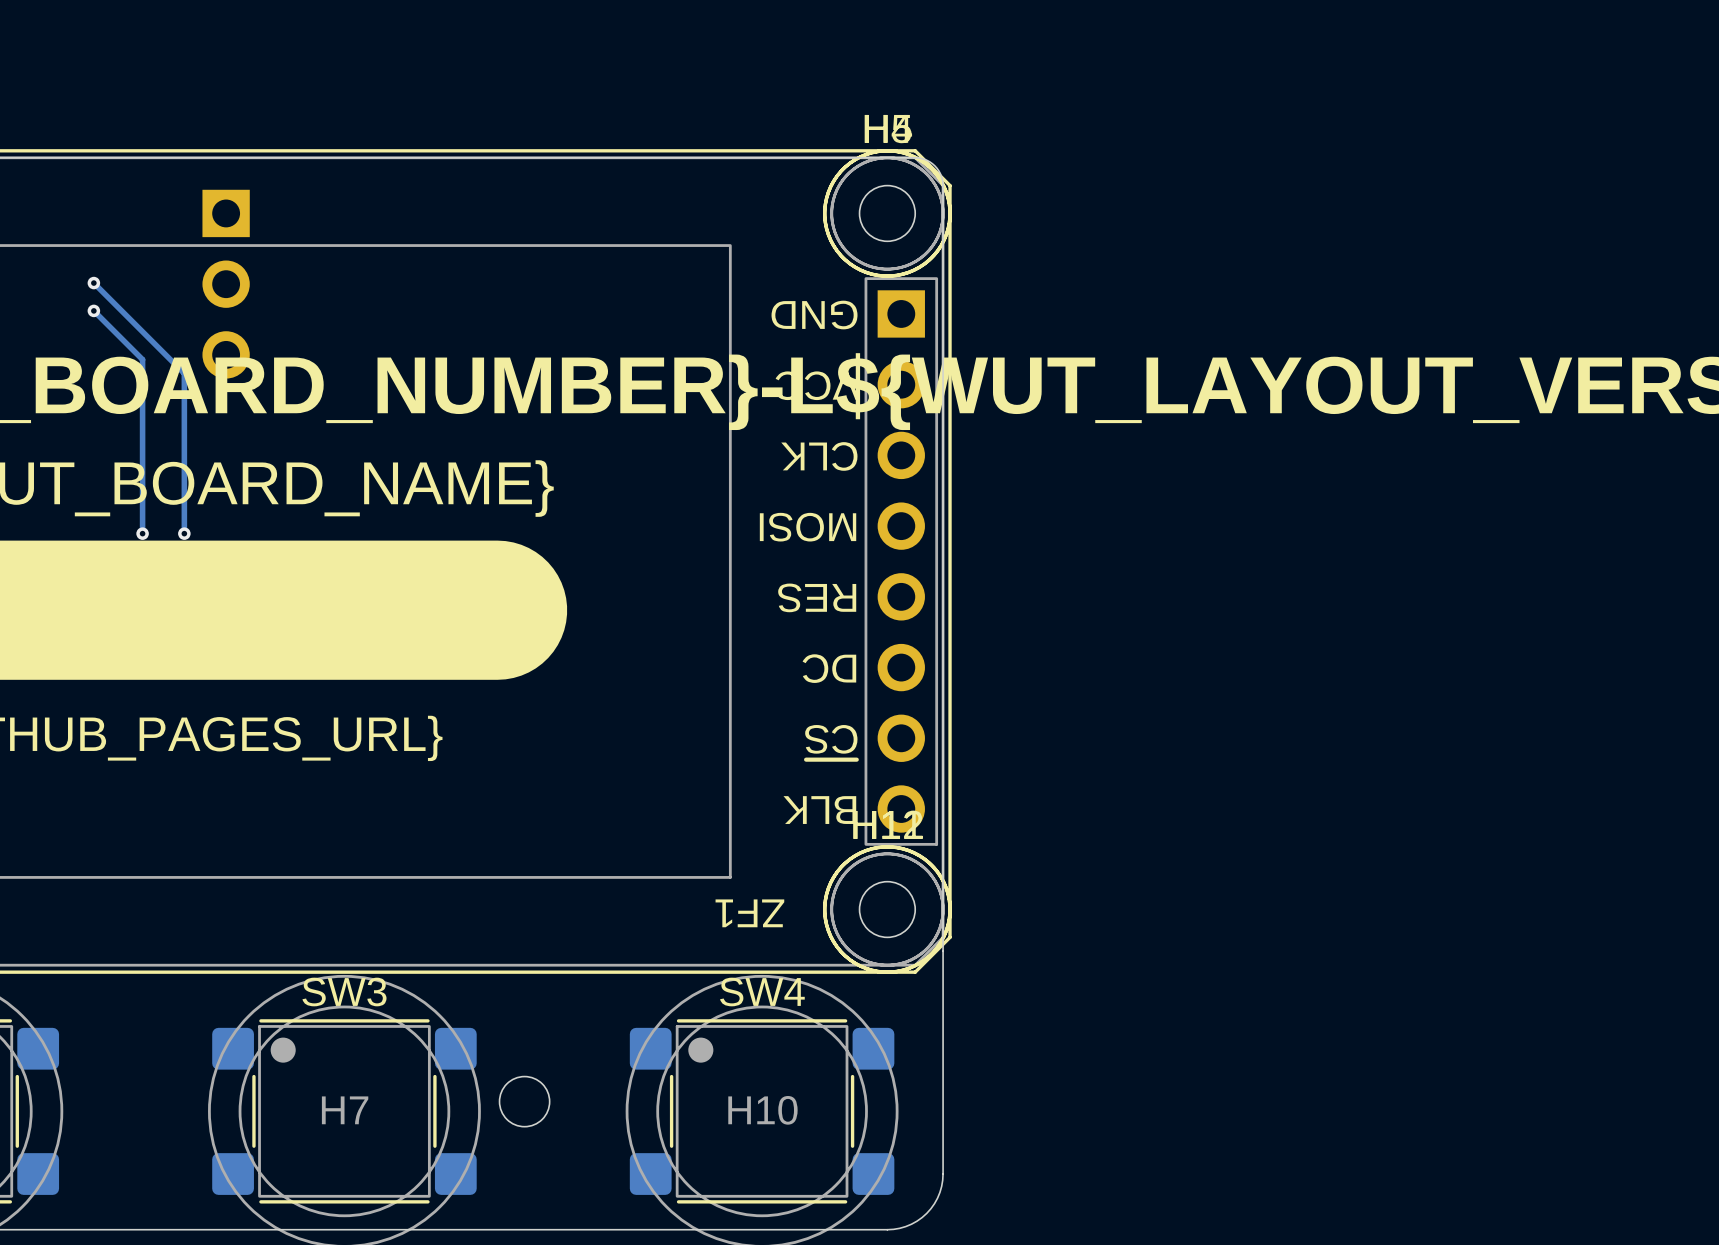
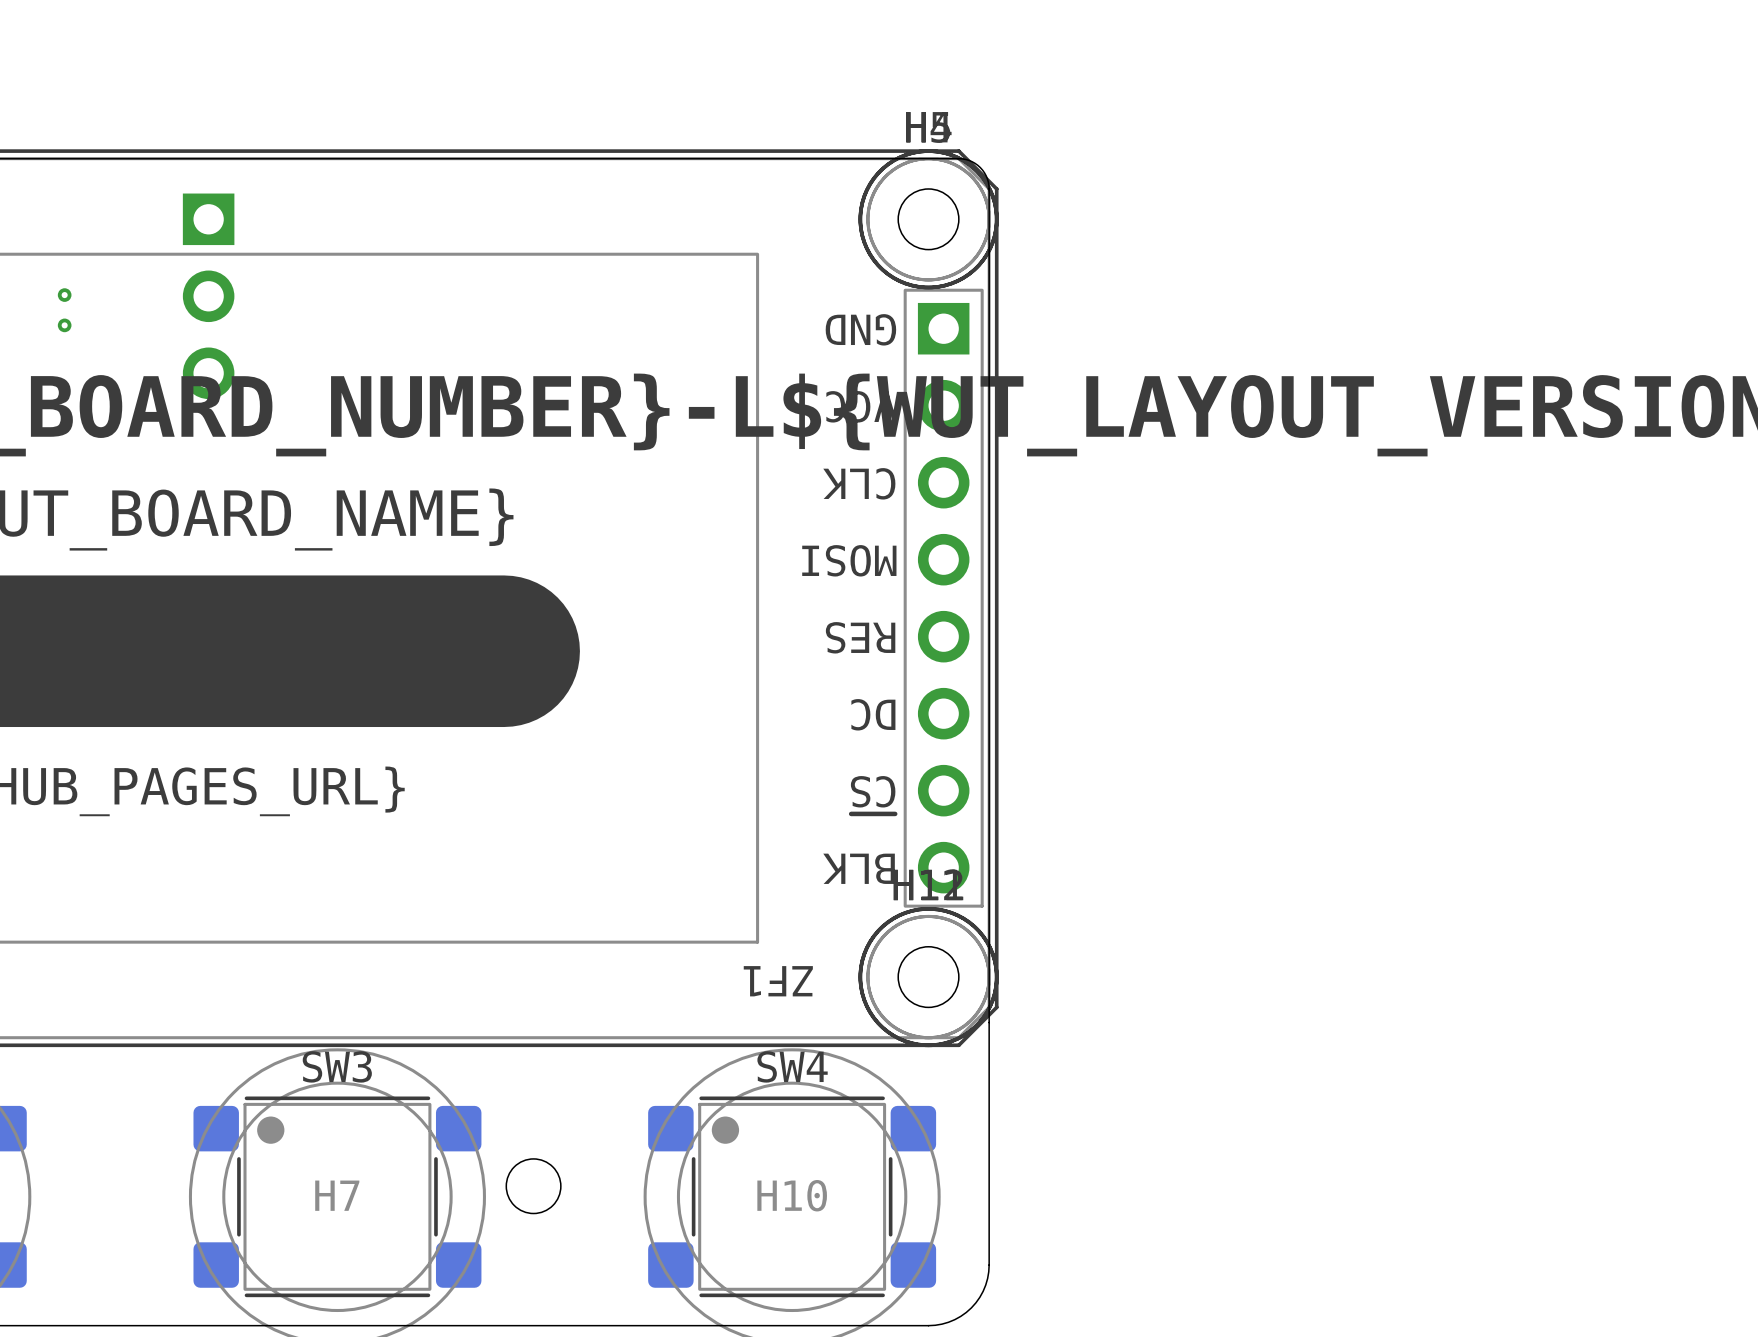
track: (93, 283) (184, 373) (184, 533) -> none
track: (93, 310) (142, 359) (142, 533) -> none
via: (142, 533) -> none
via: (184, 533) -> none

